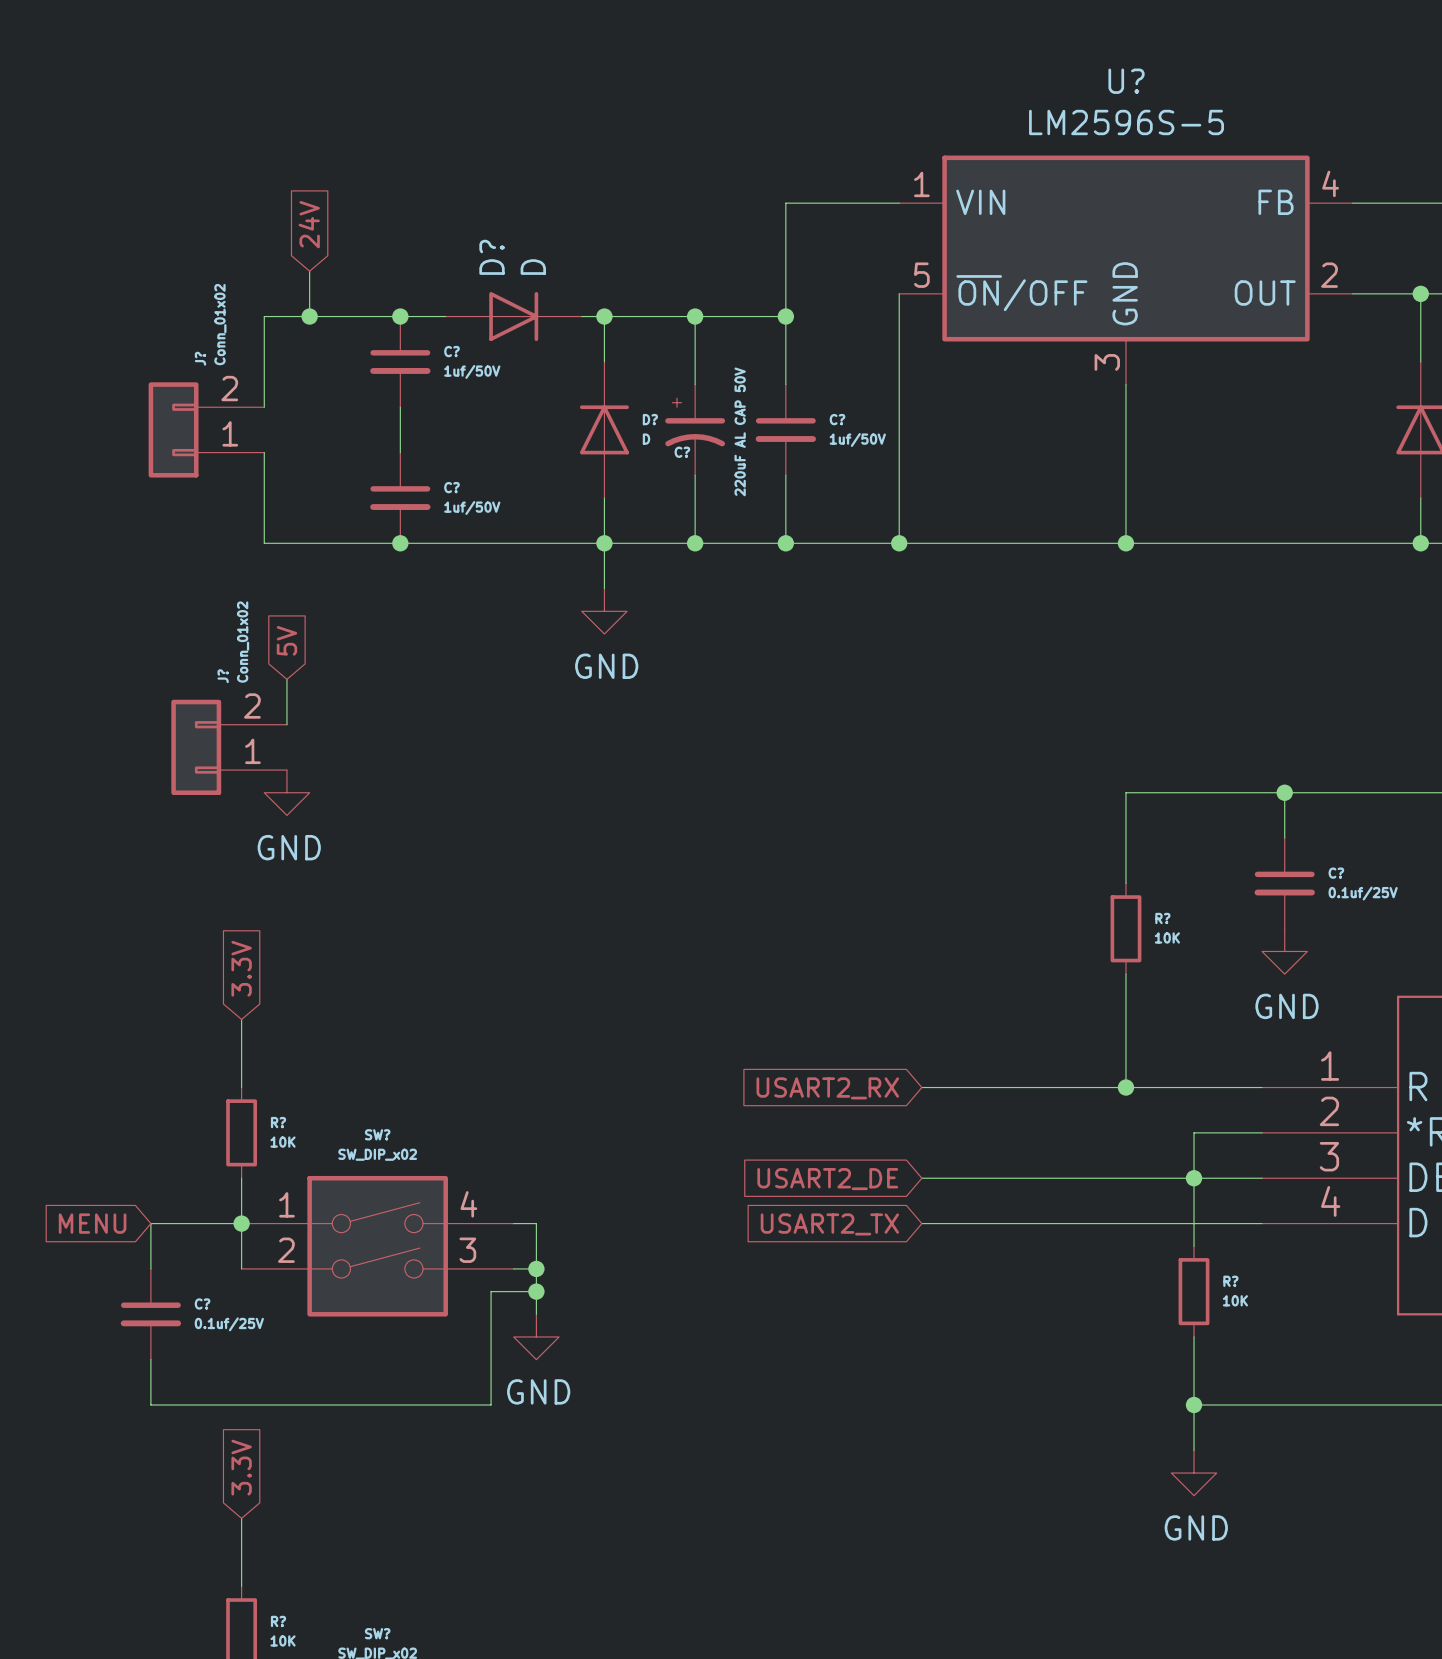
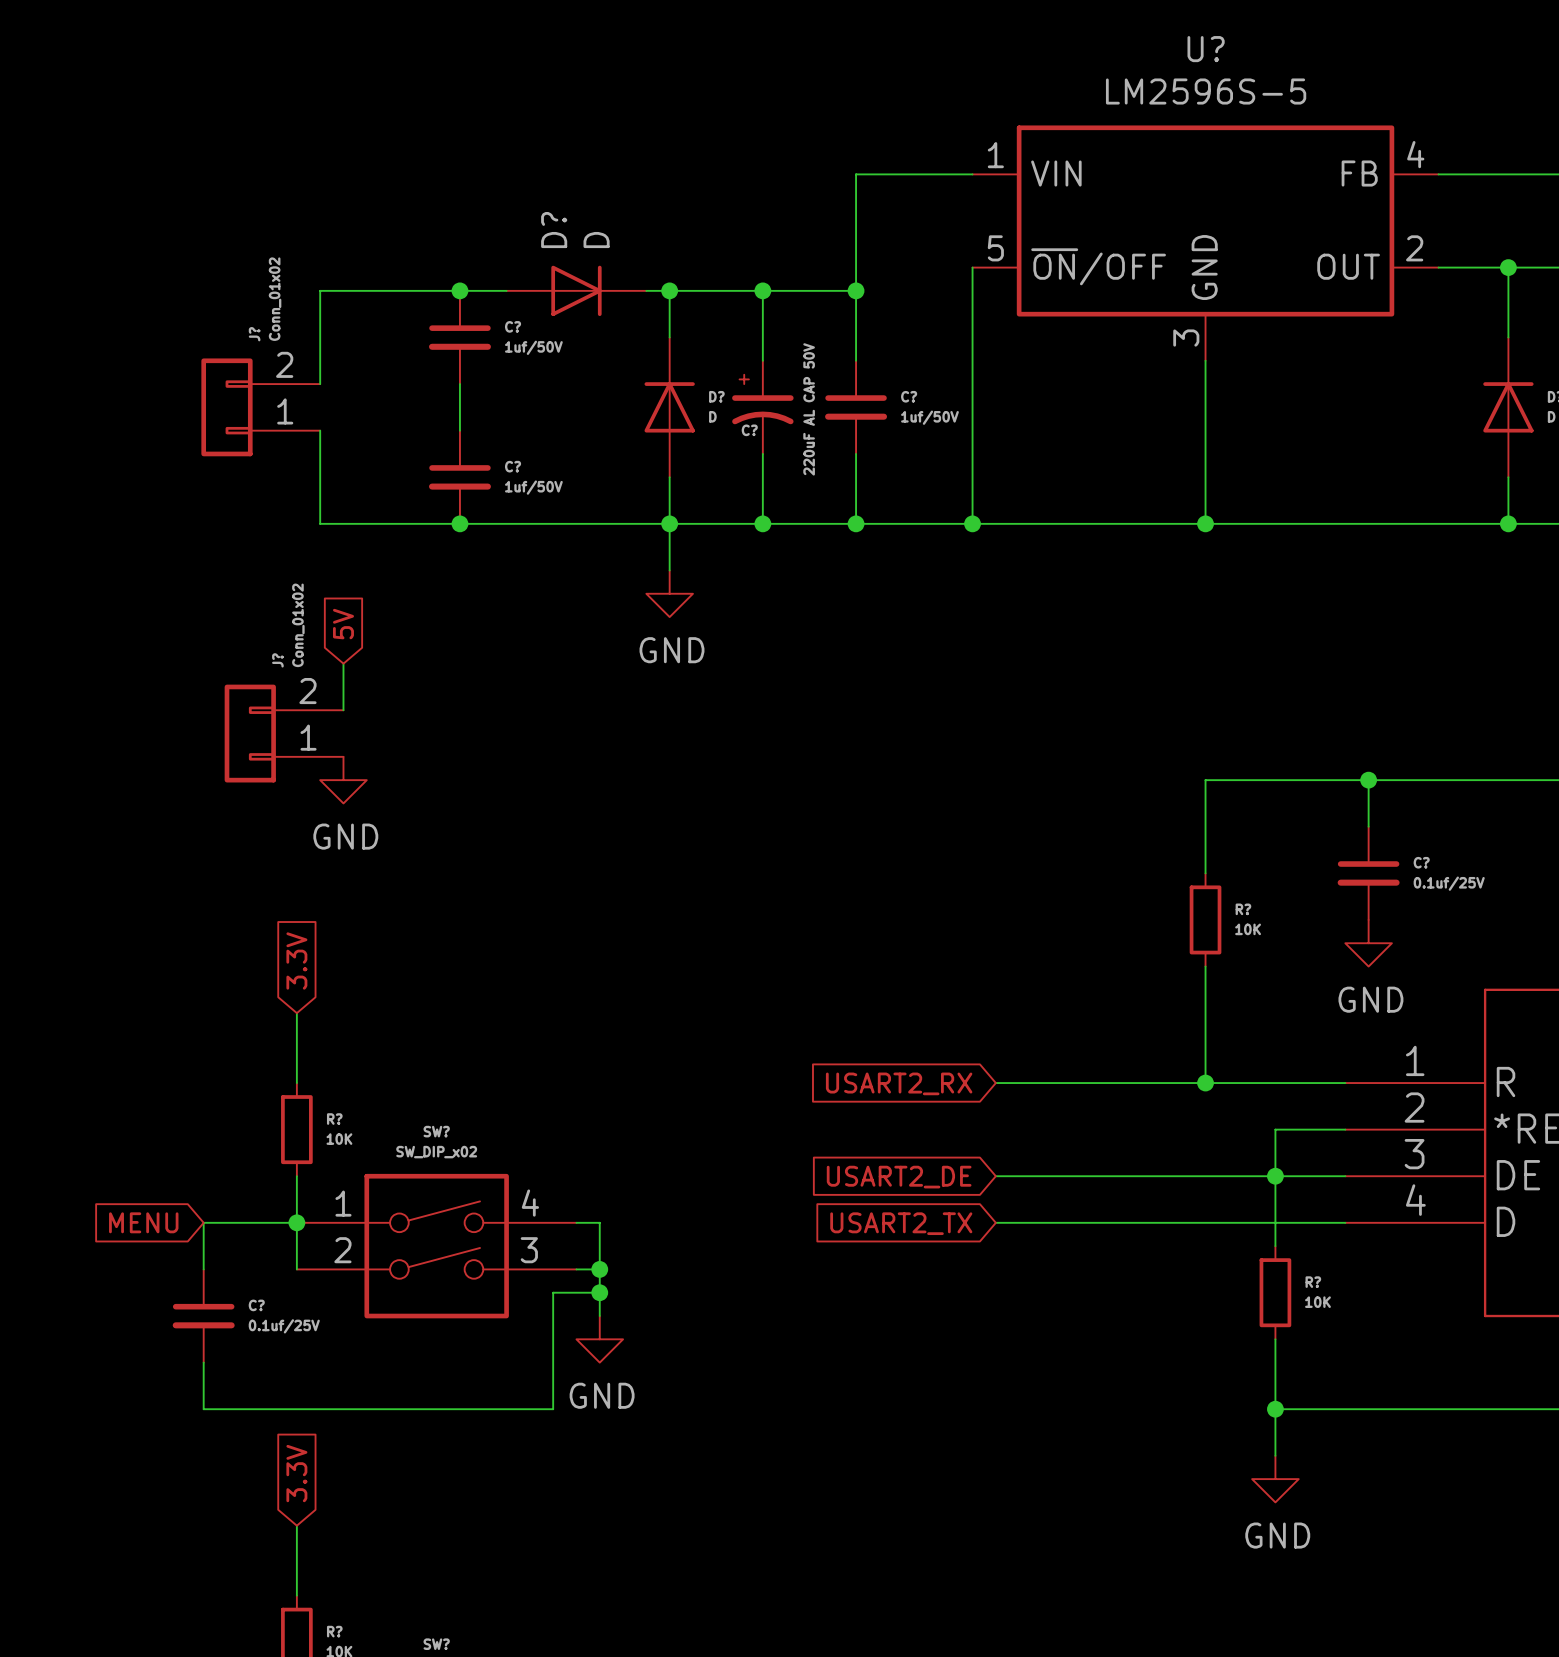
global label: 24V (309, 224) -> none
wire: (309, 271) (309, 316) -> none
junction: (309, 316) -> none

